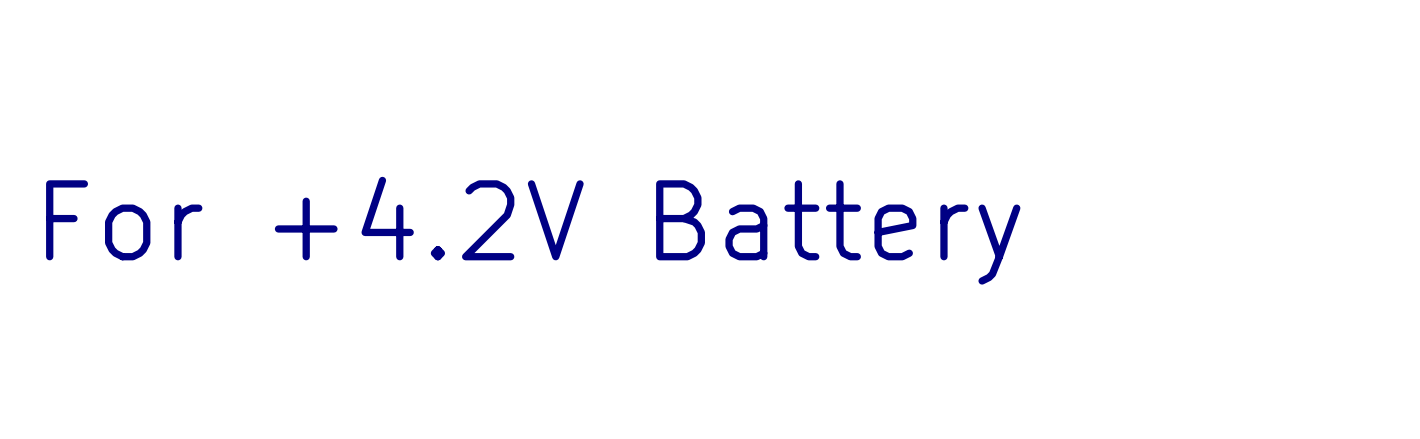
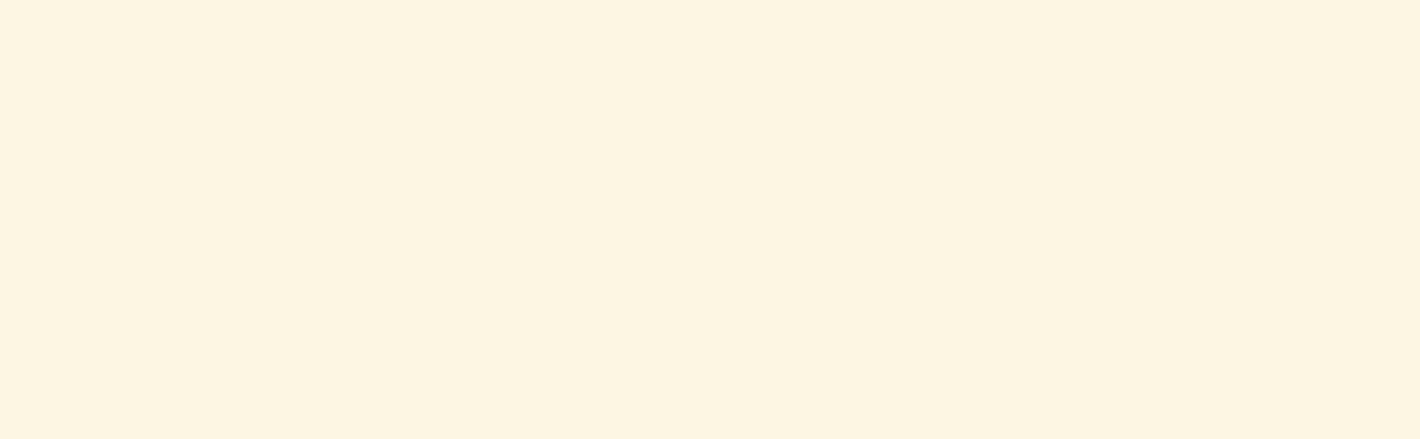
text: For +4.2V Battery (533, 230) -> none

